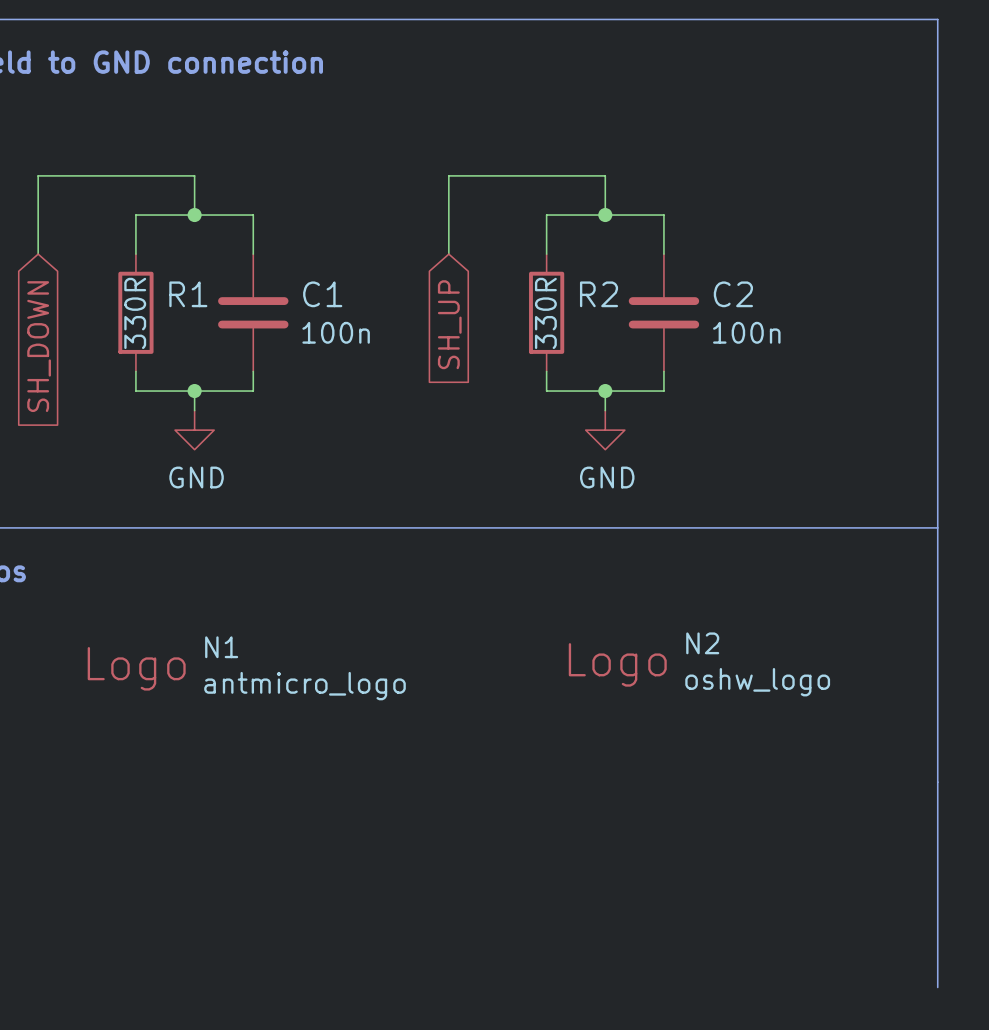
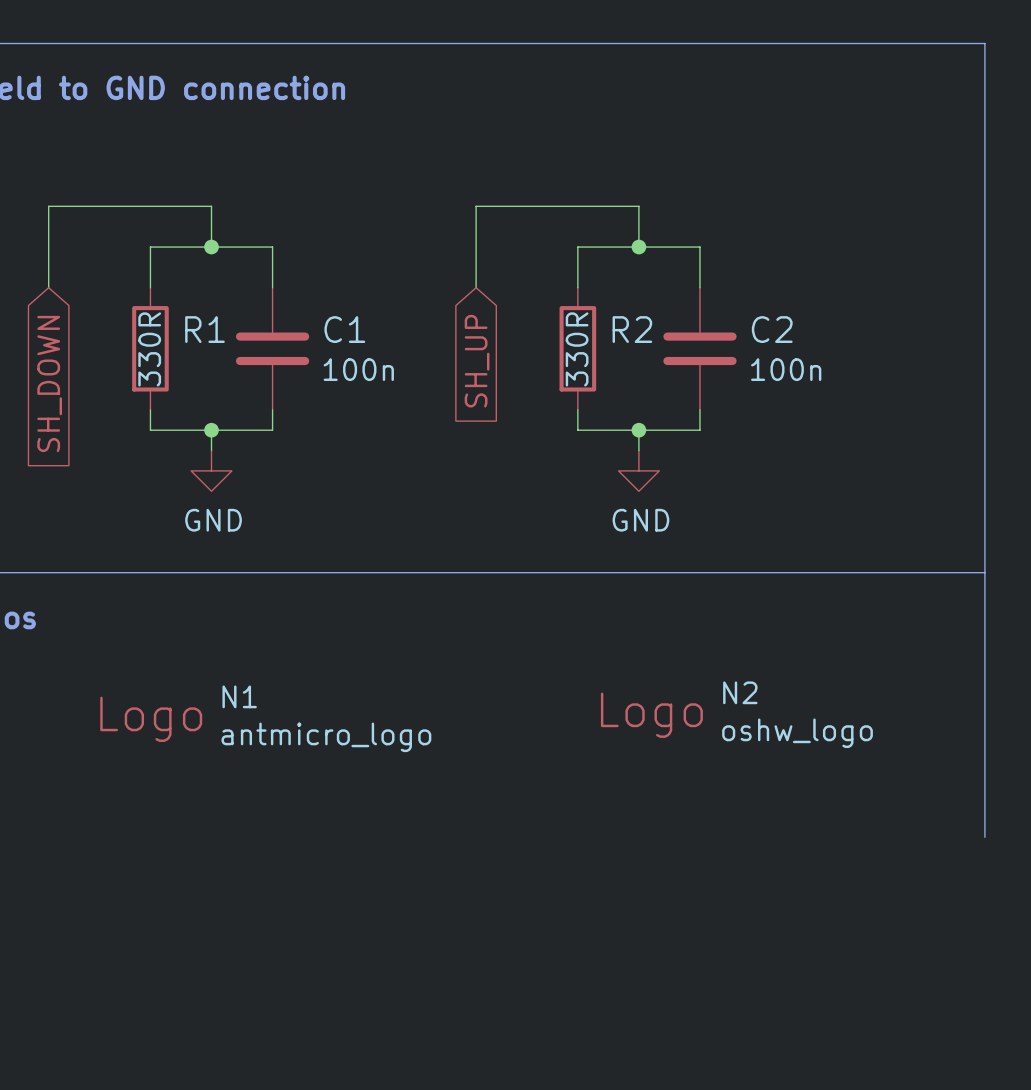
line: (937, 782) (937, 987) -> none

